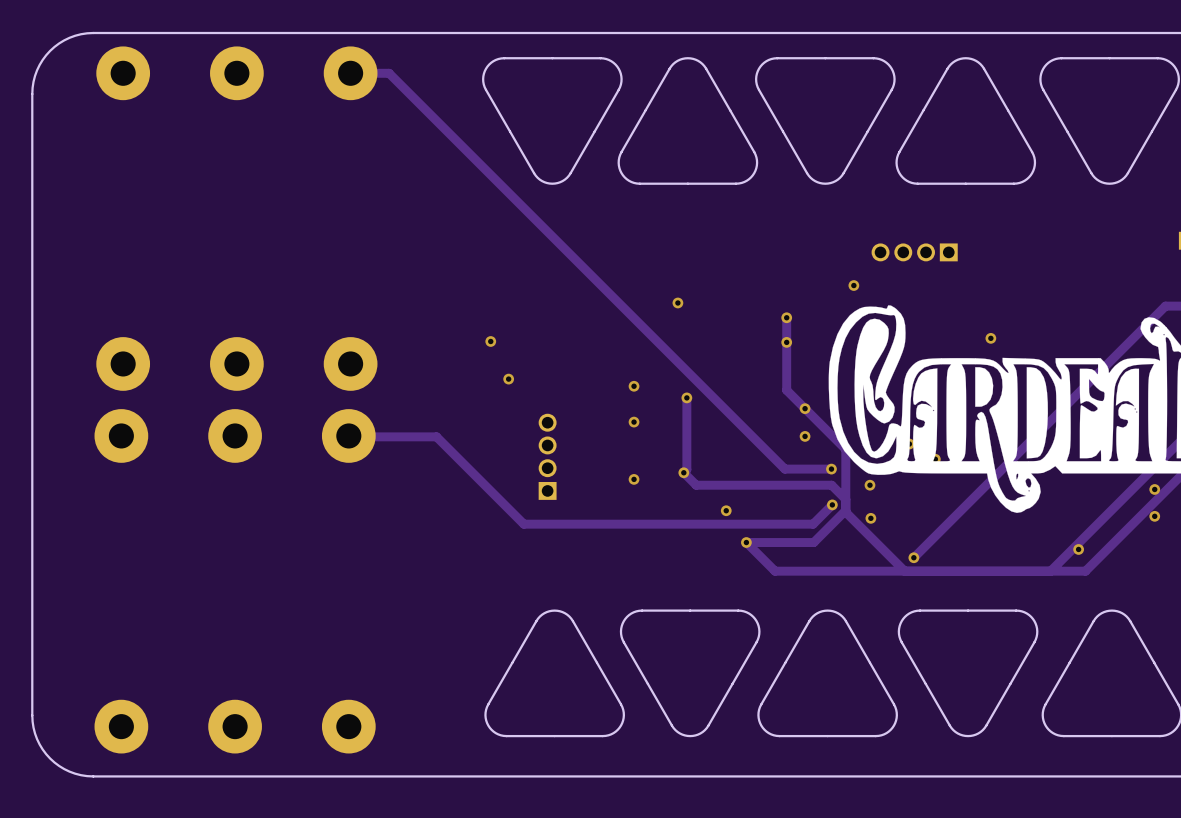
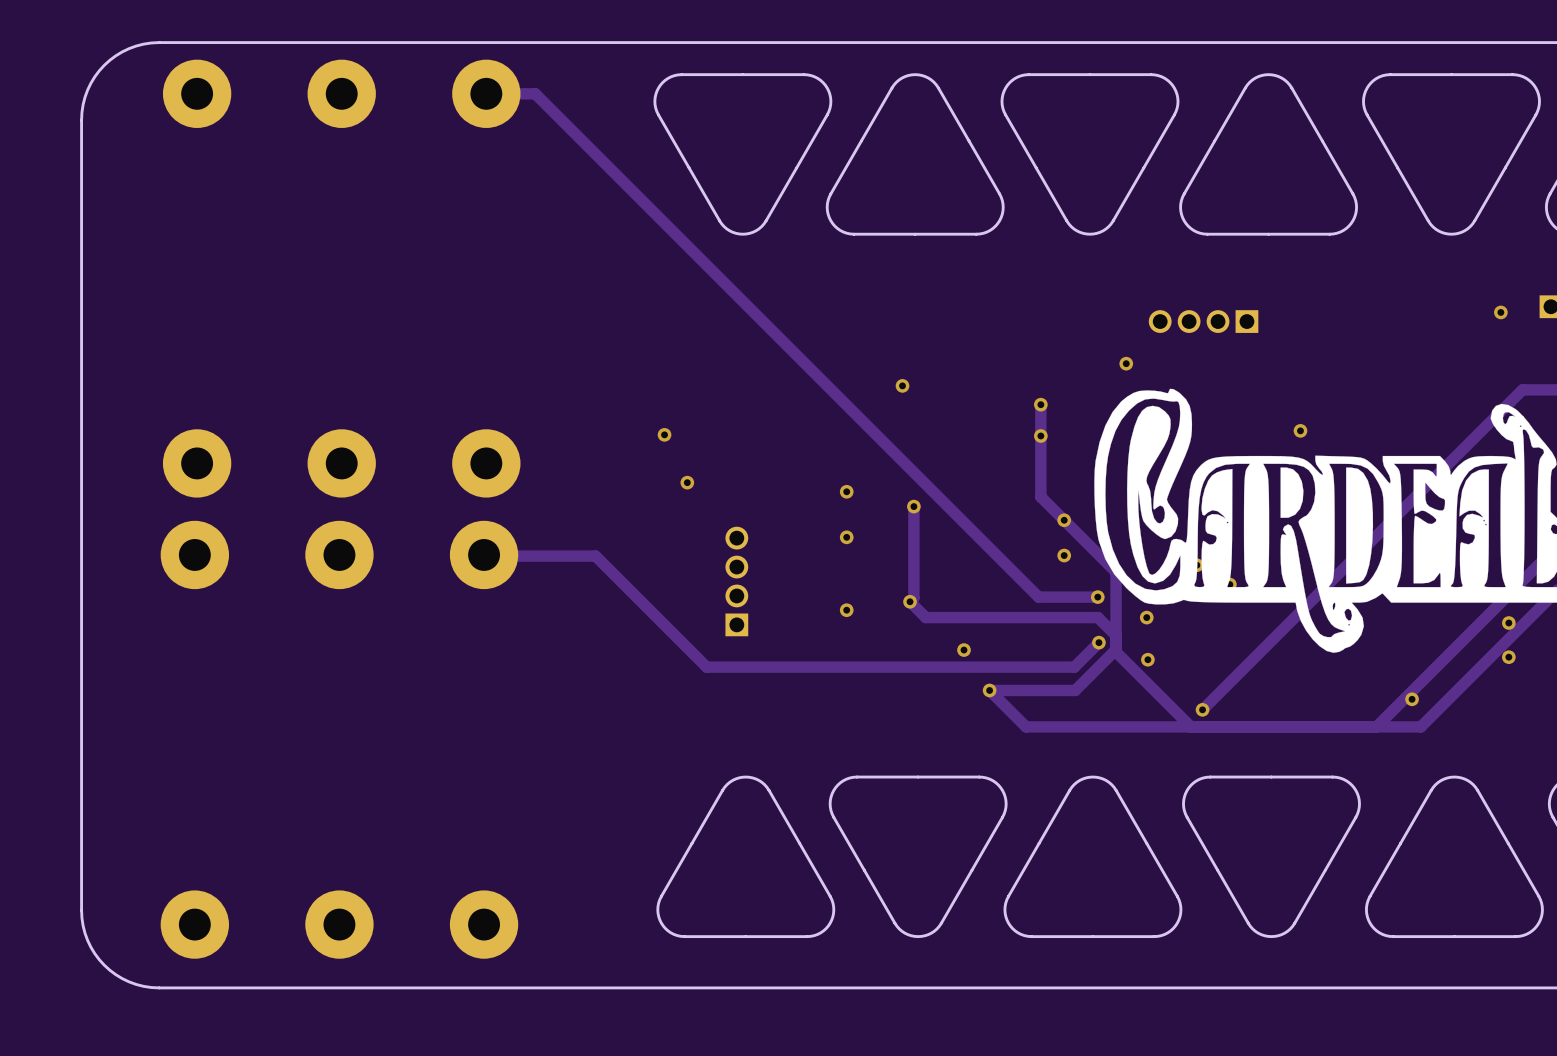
via: none -> (1500, 312)

